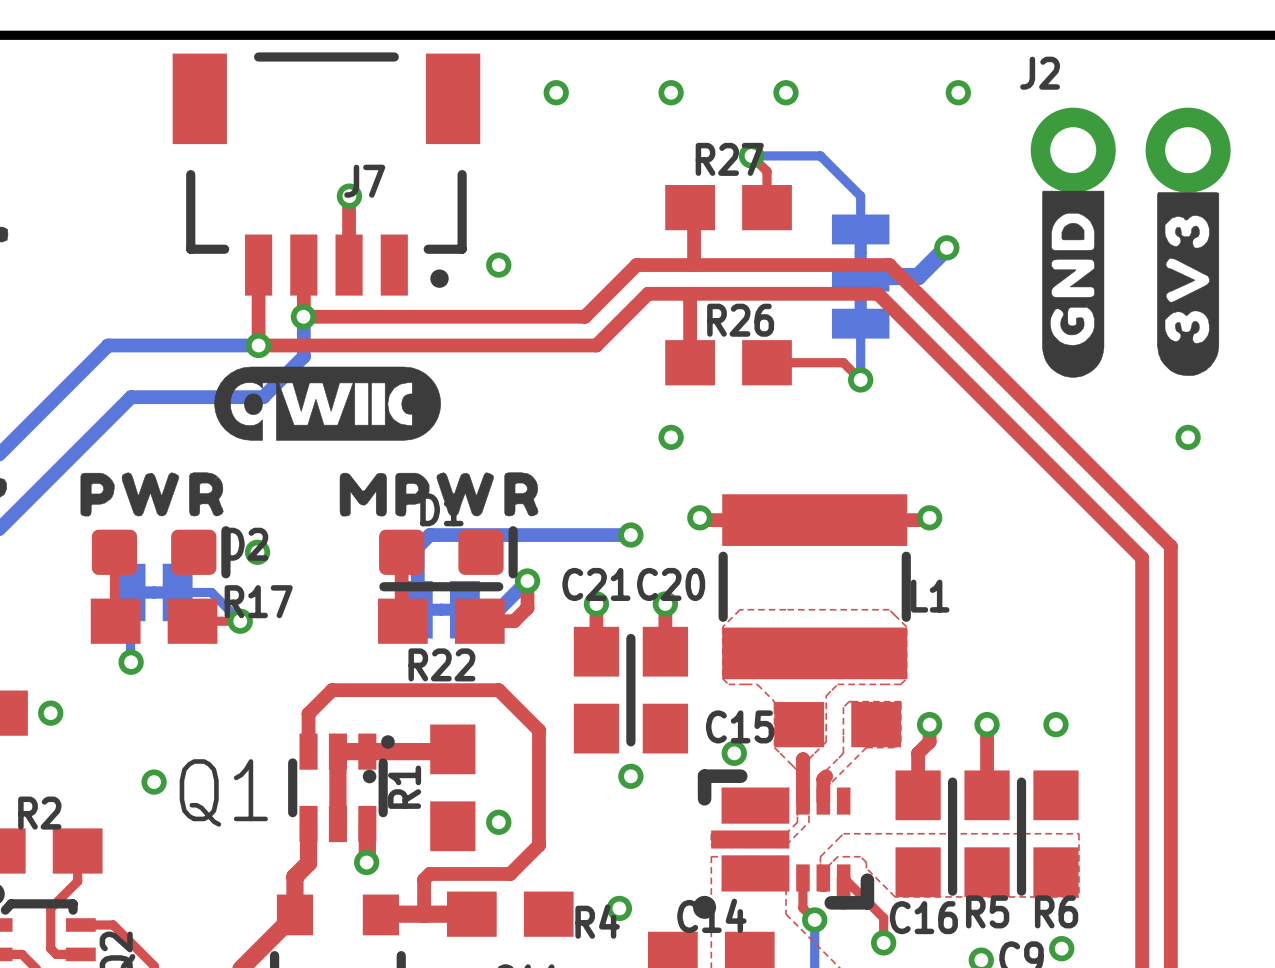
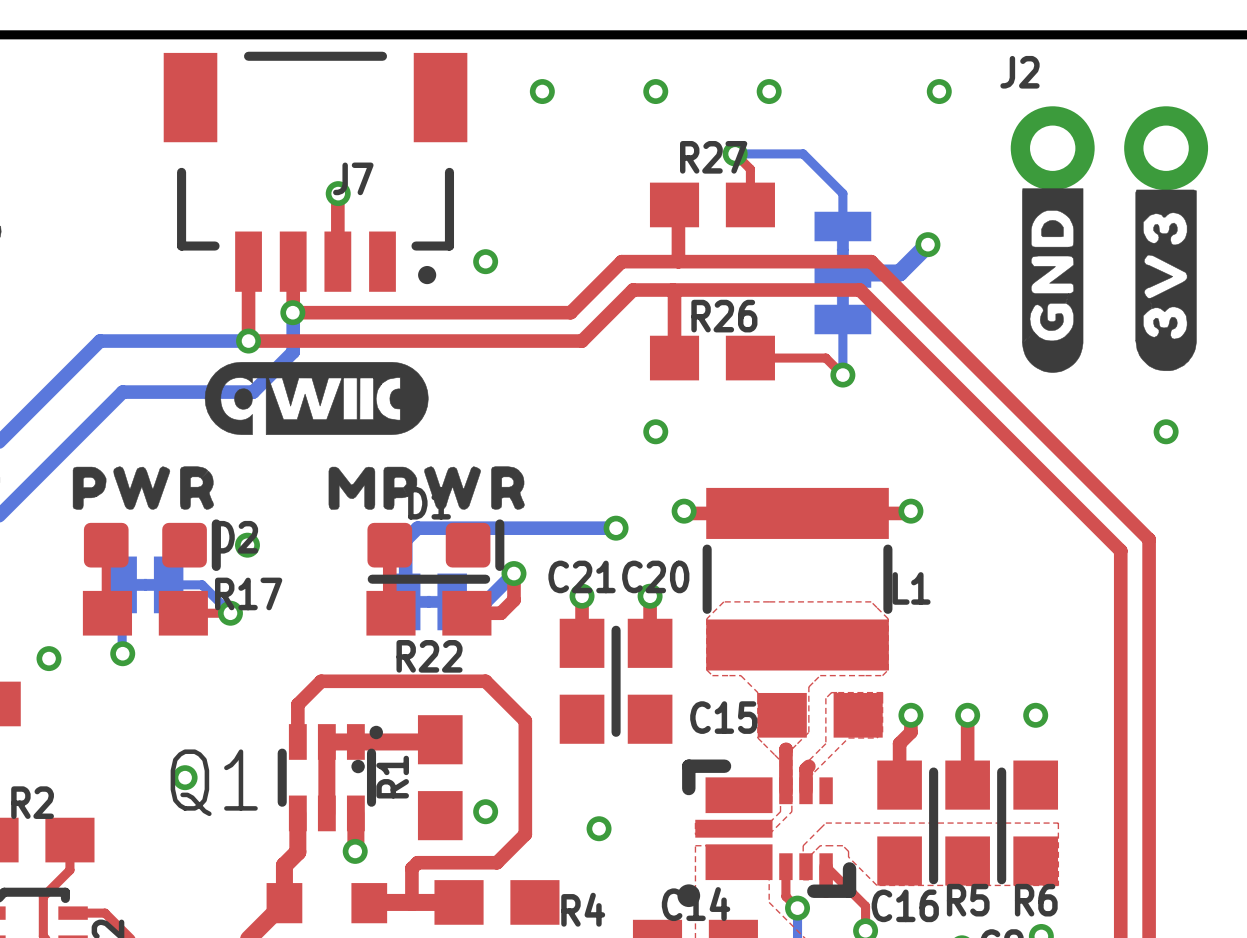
via position: (50, 713) -> (49, 658)
via: (734, 753) -> none
via: (630, 776) -> none
via position: (154, 782) -> (185, 777)
via: none -> (599, 828)
via: (619, 908) -> none

